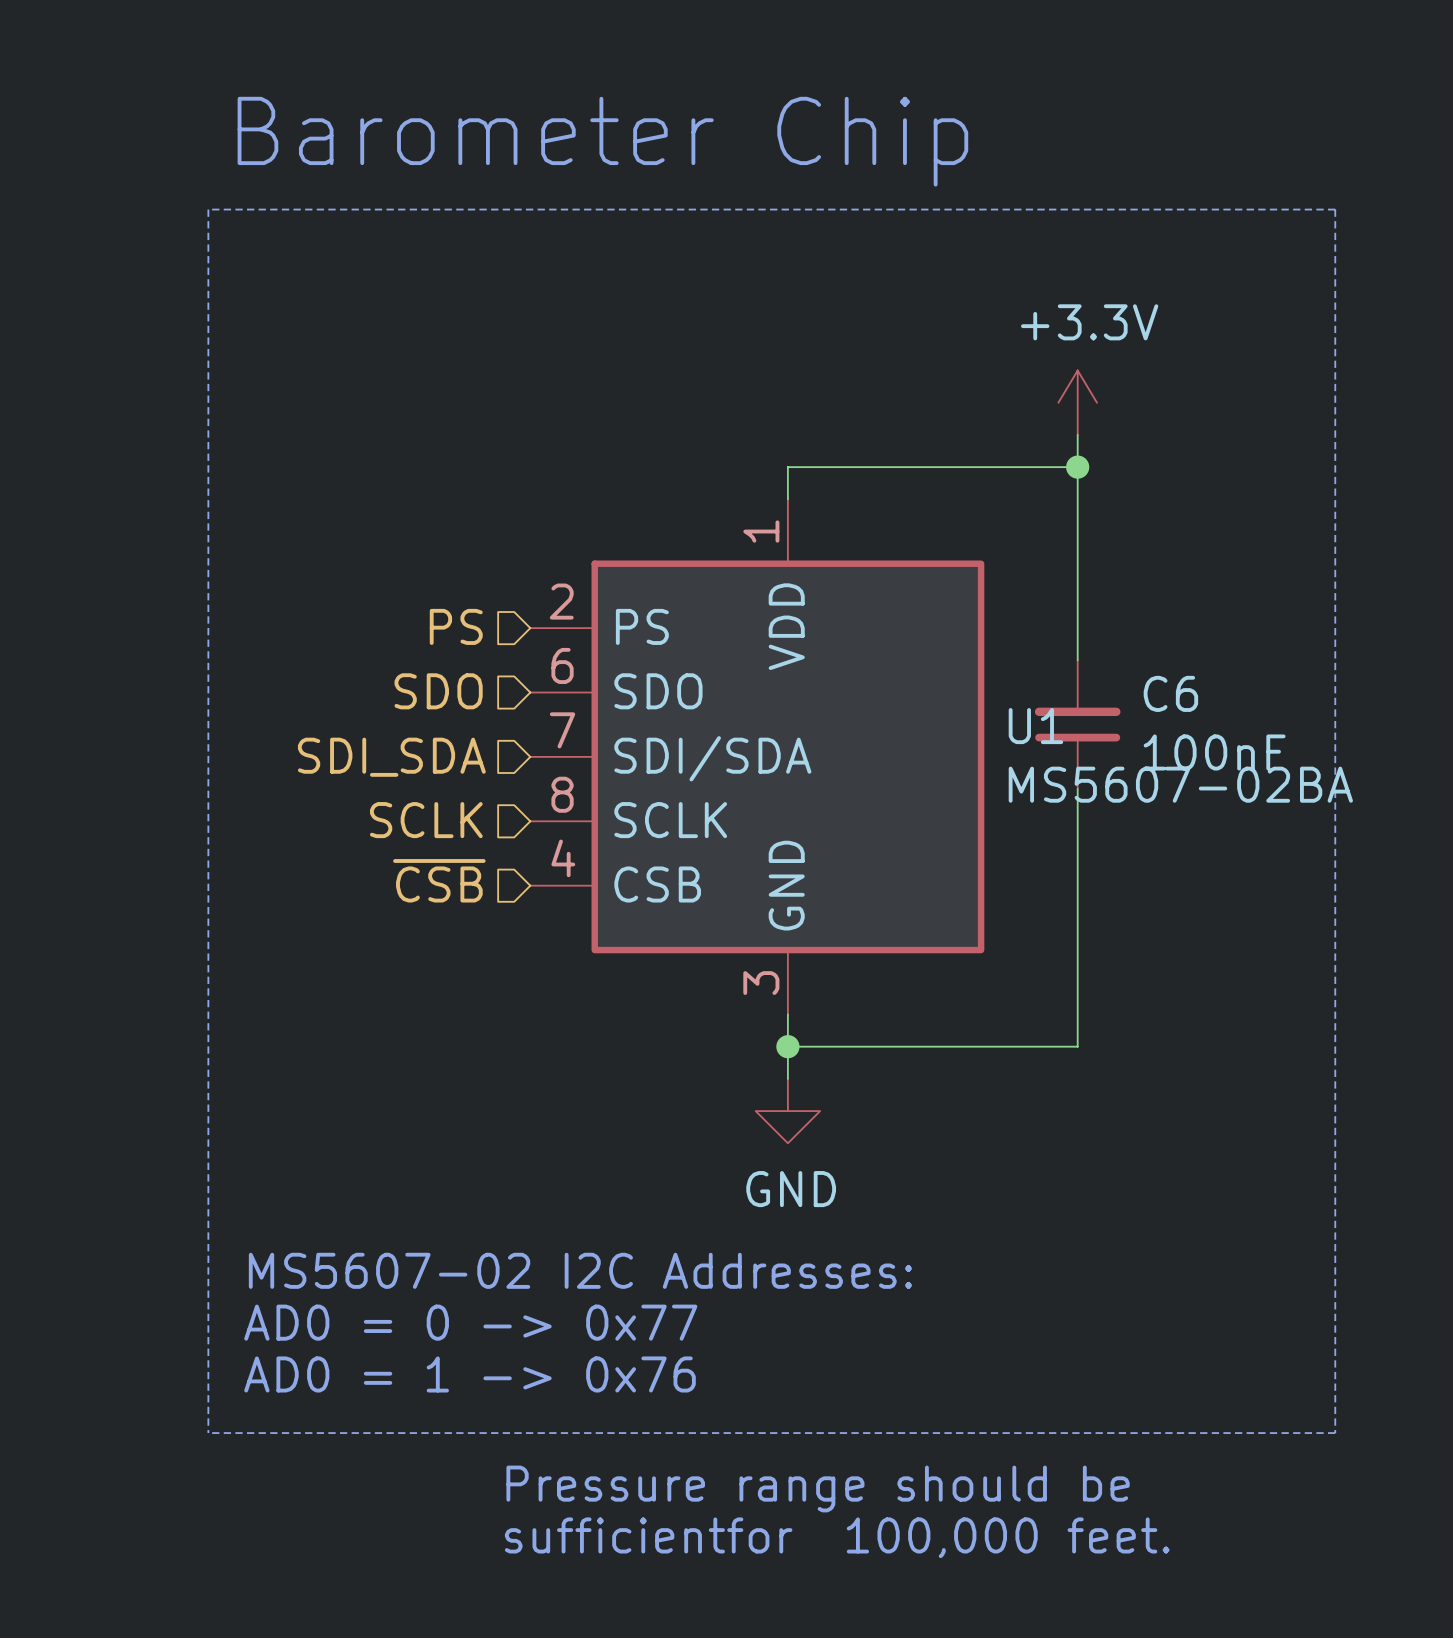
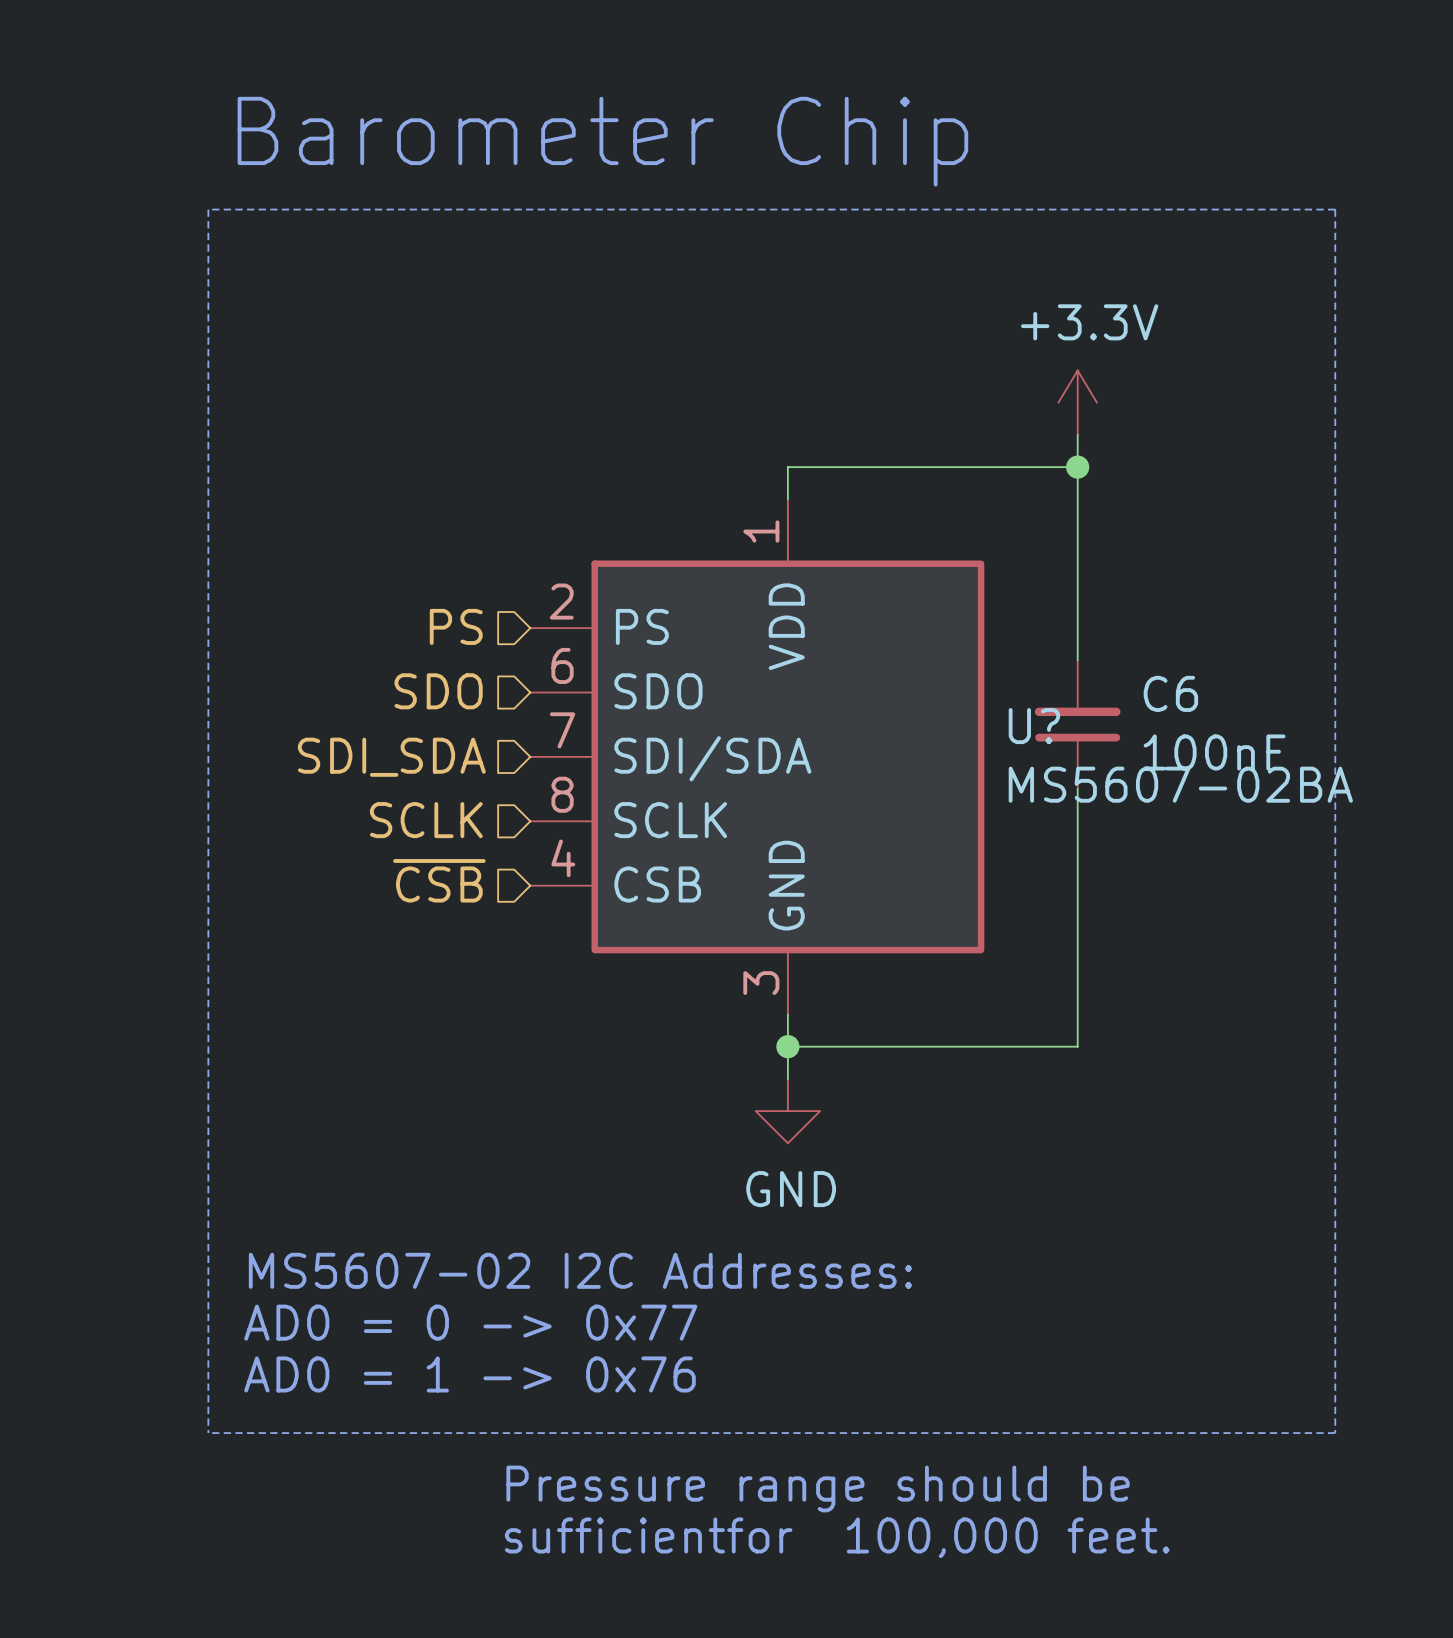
U1 name: U1 (1035, 726) -> U? (1034, 726)

